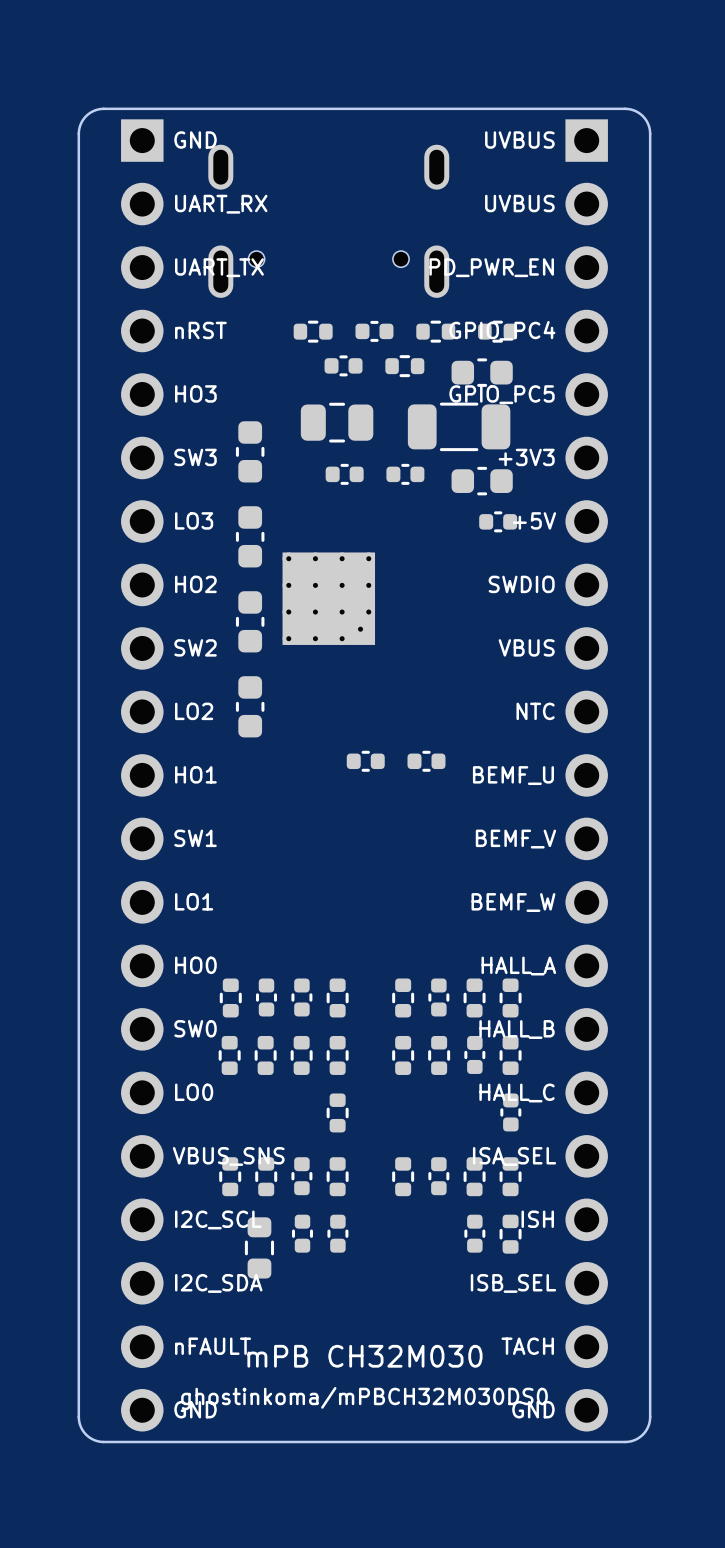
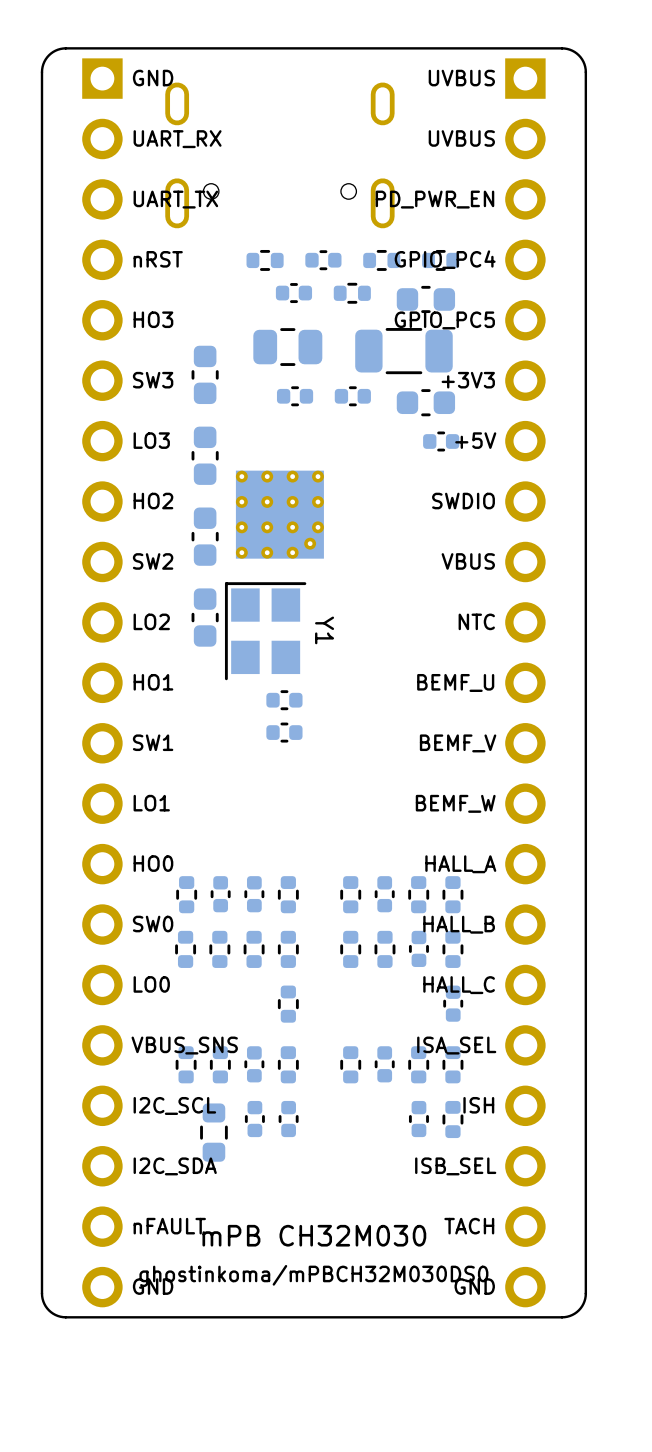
Y1: none -> (265, 631)
part: (365, 761) -> none
part: (426, 761) -> none
part: none -> (284, 700)
part: none -> (284, 732)

